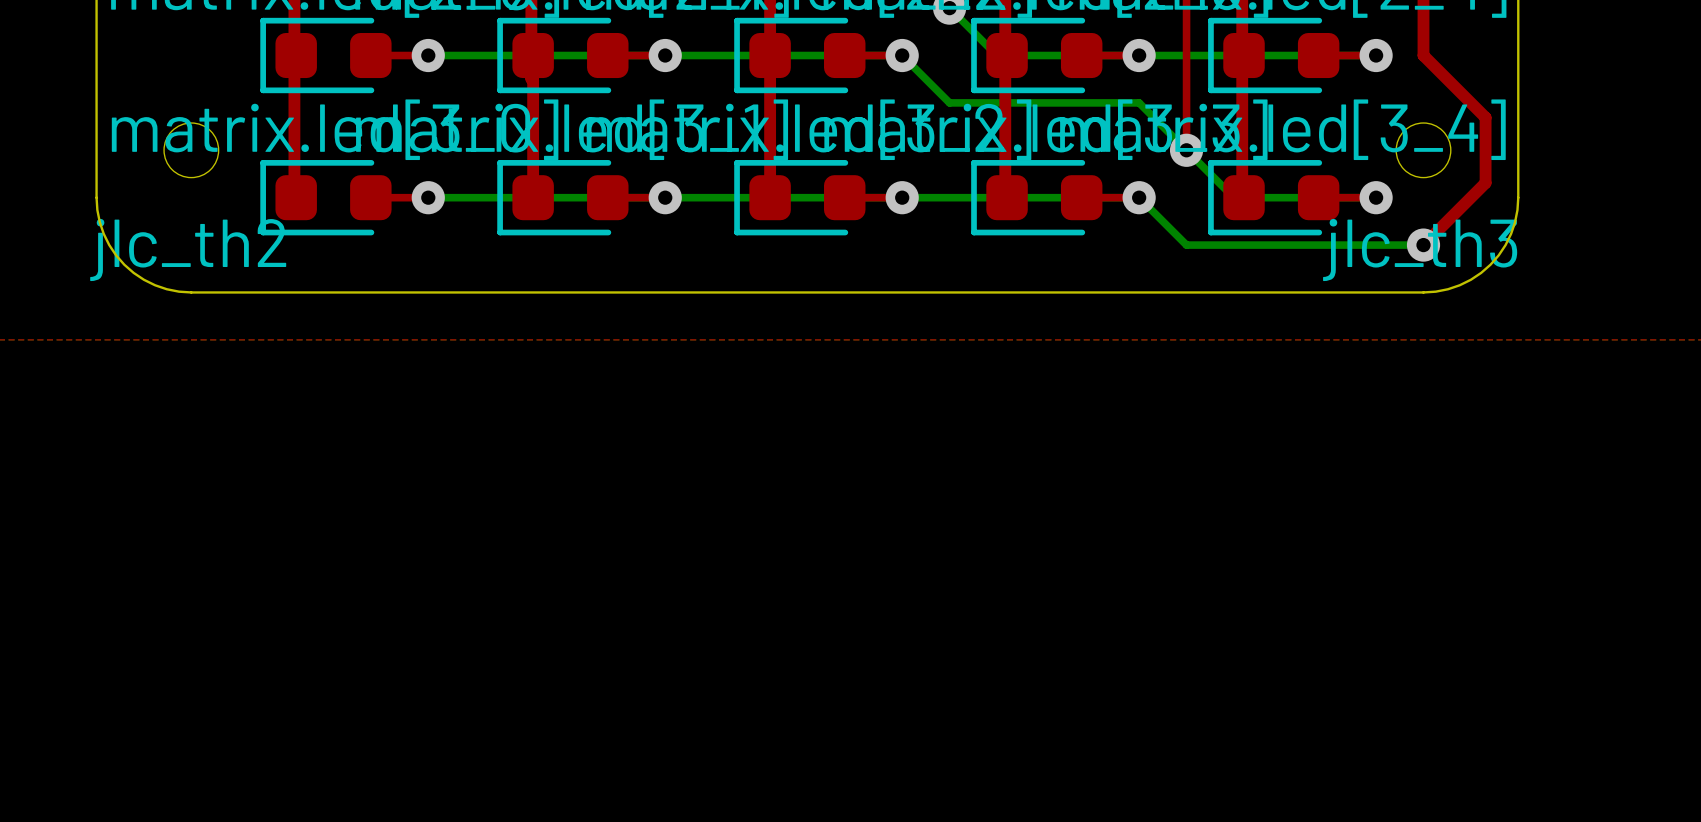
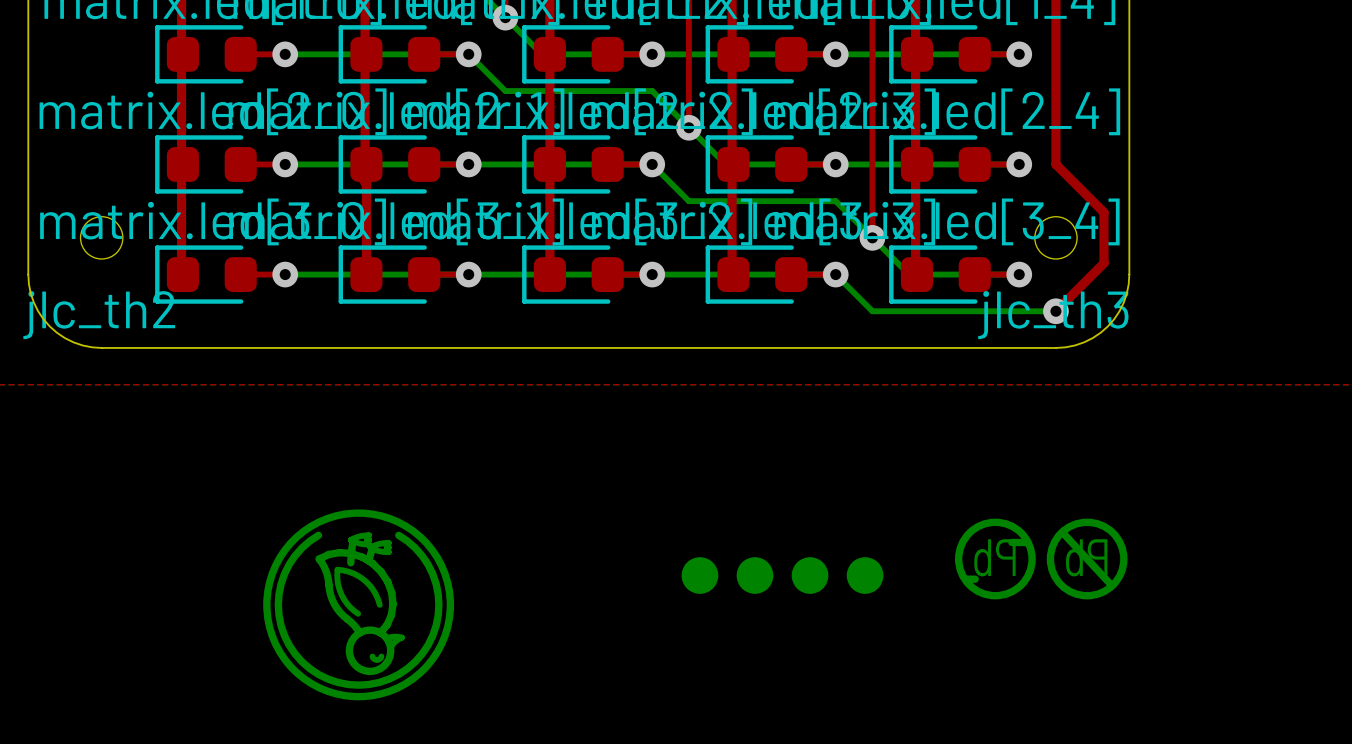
drawing: none -> [263, 509, 455, 701]
drawing: none -> [955, 518, 1128, 600]
drawing: none -> [681, 557, 884, 594]

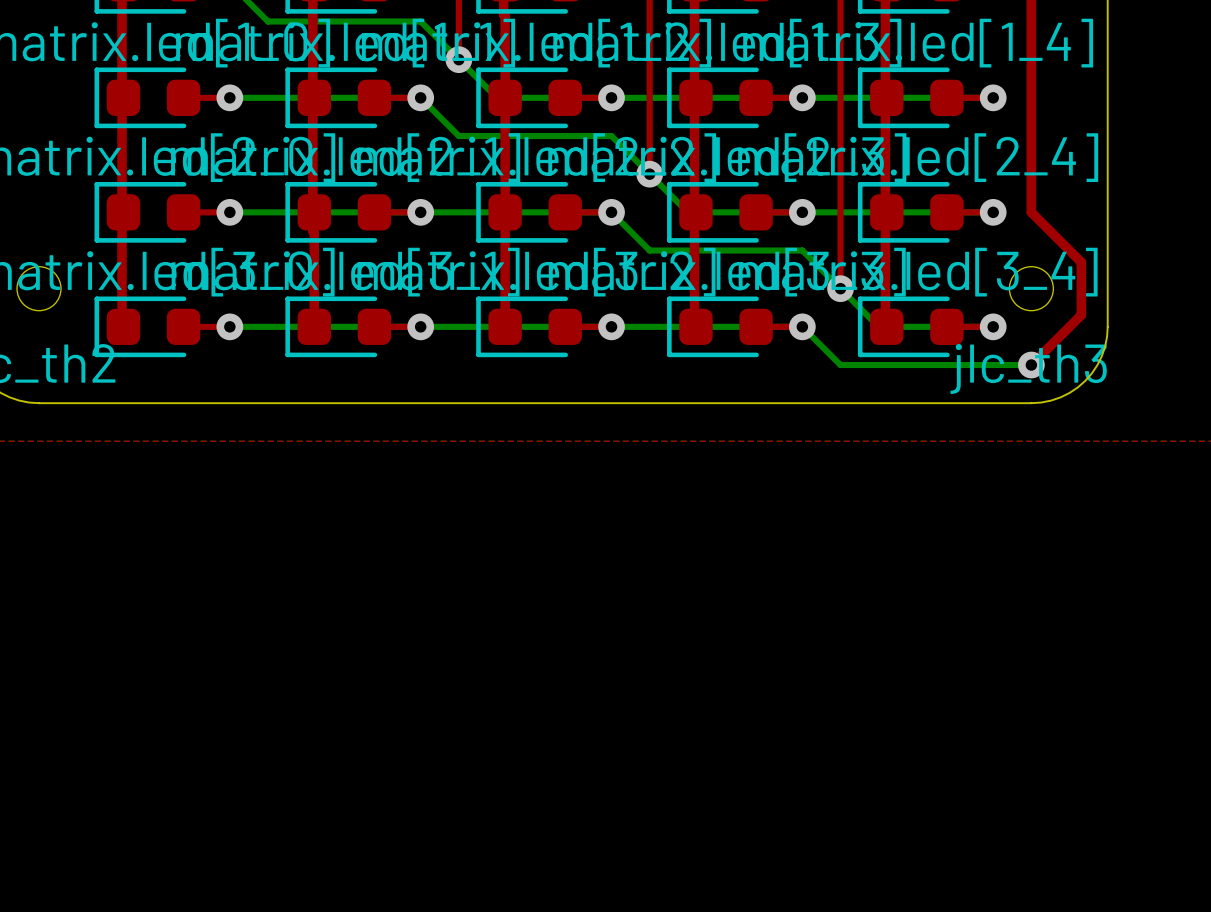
drawing: [263, 509, 455, 701] -> none
drawing: [955, 518, 1128, 600] -> none
drawing: [681, 557, 884, 594] -> none

